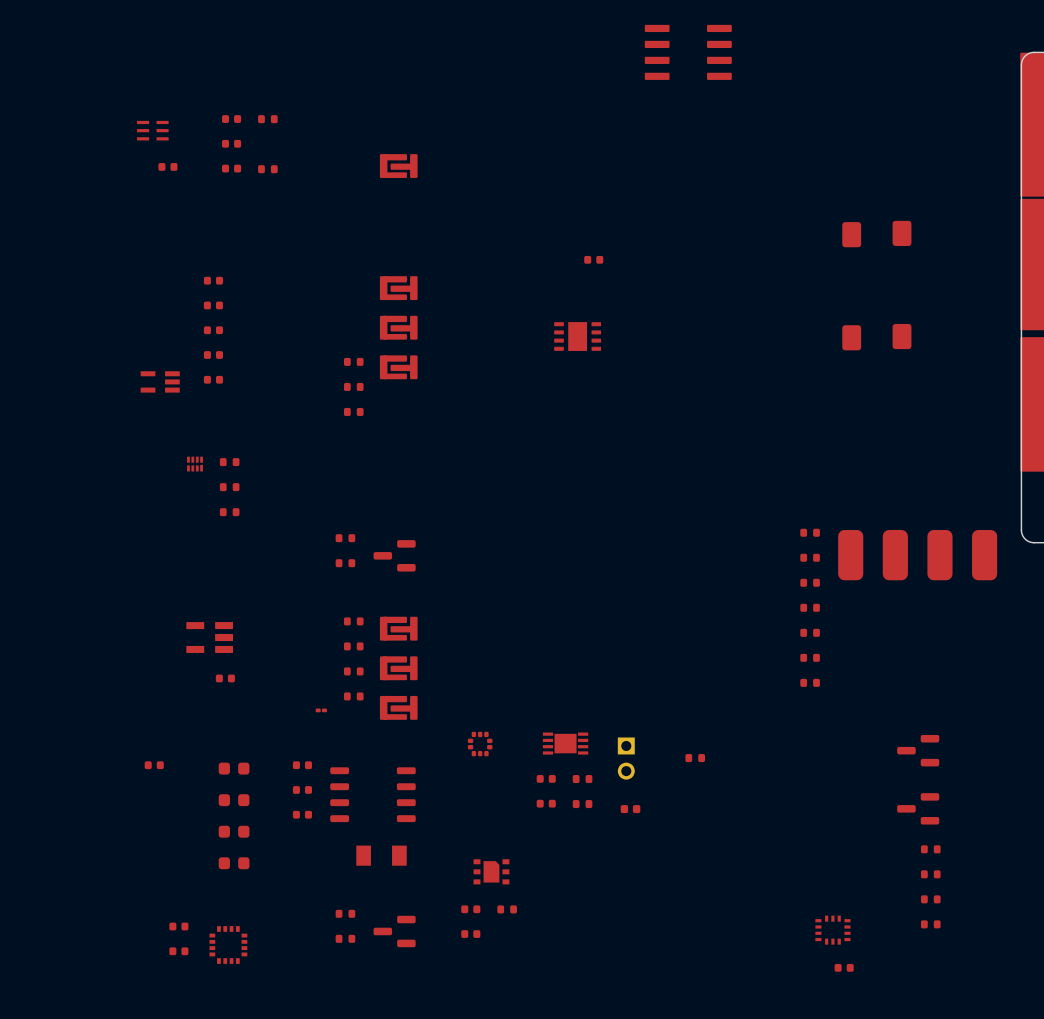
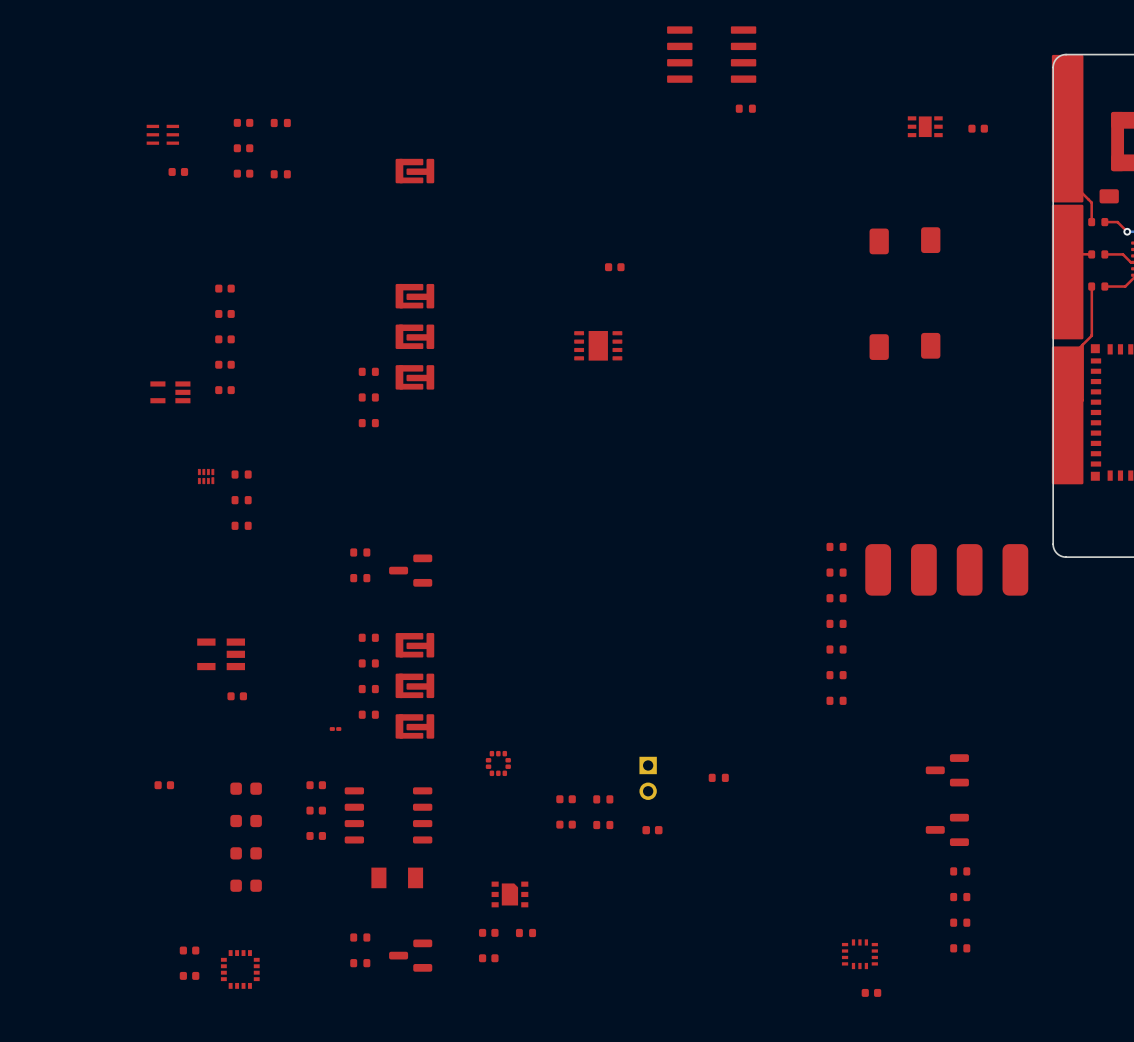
part: none -> (745, 108)
part: none -> (925, 126)
part: none -> (978, 128)
part: (565, 743) -> none

